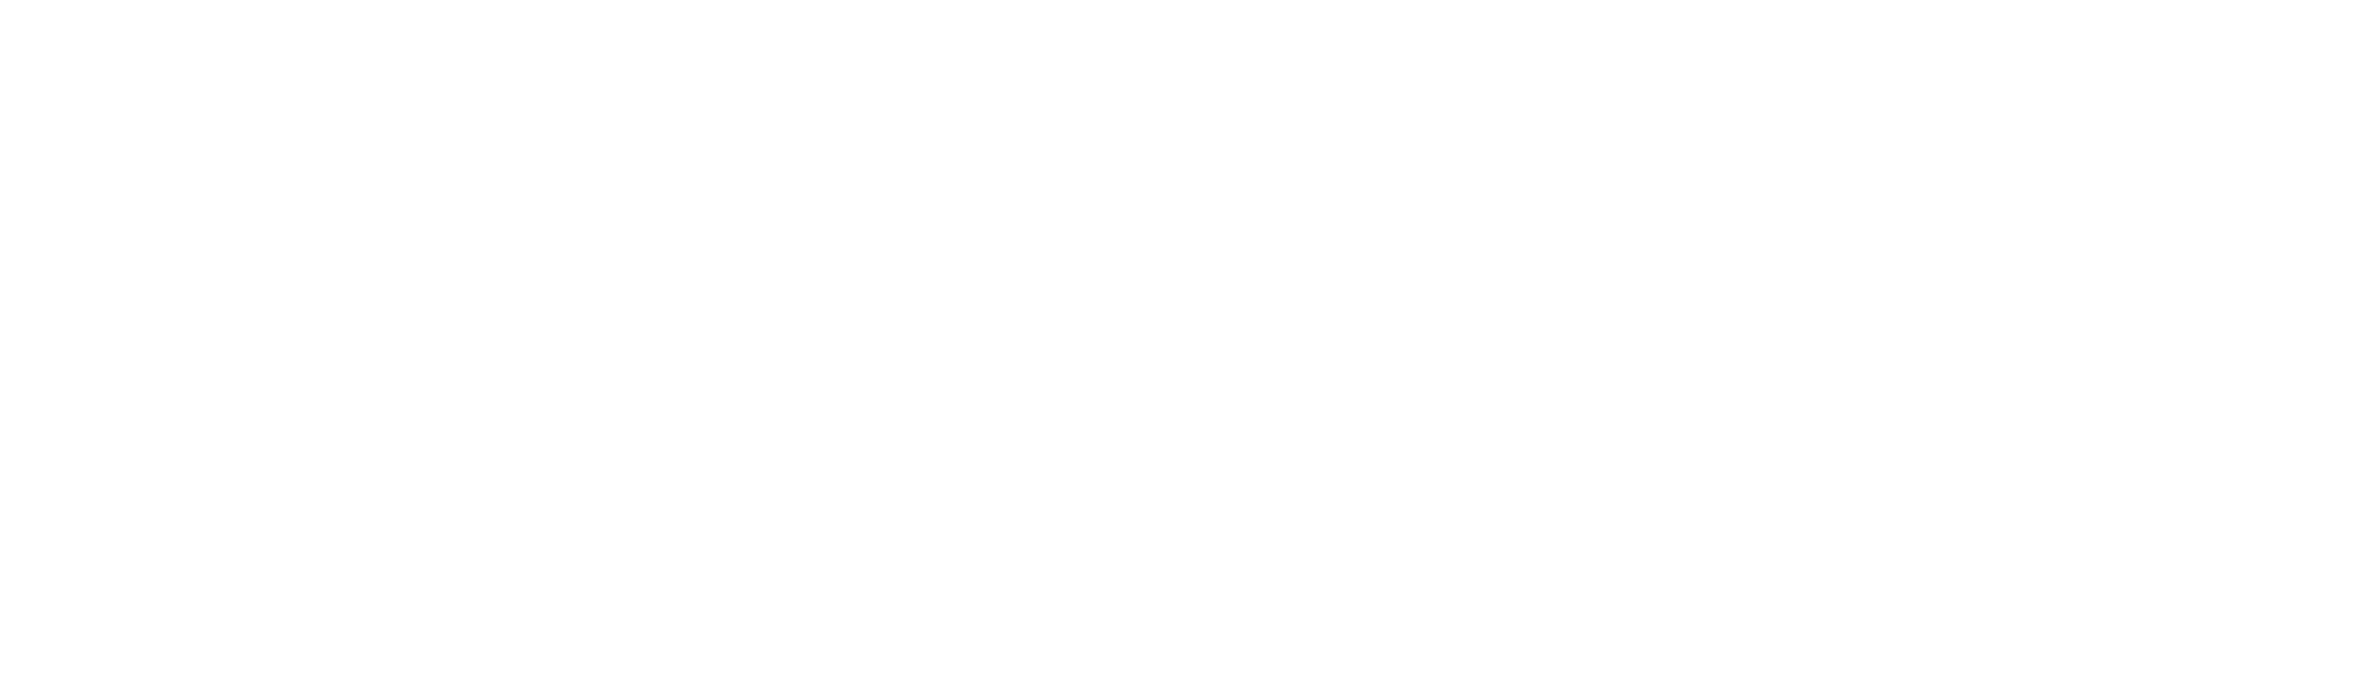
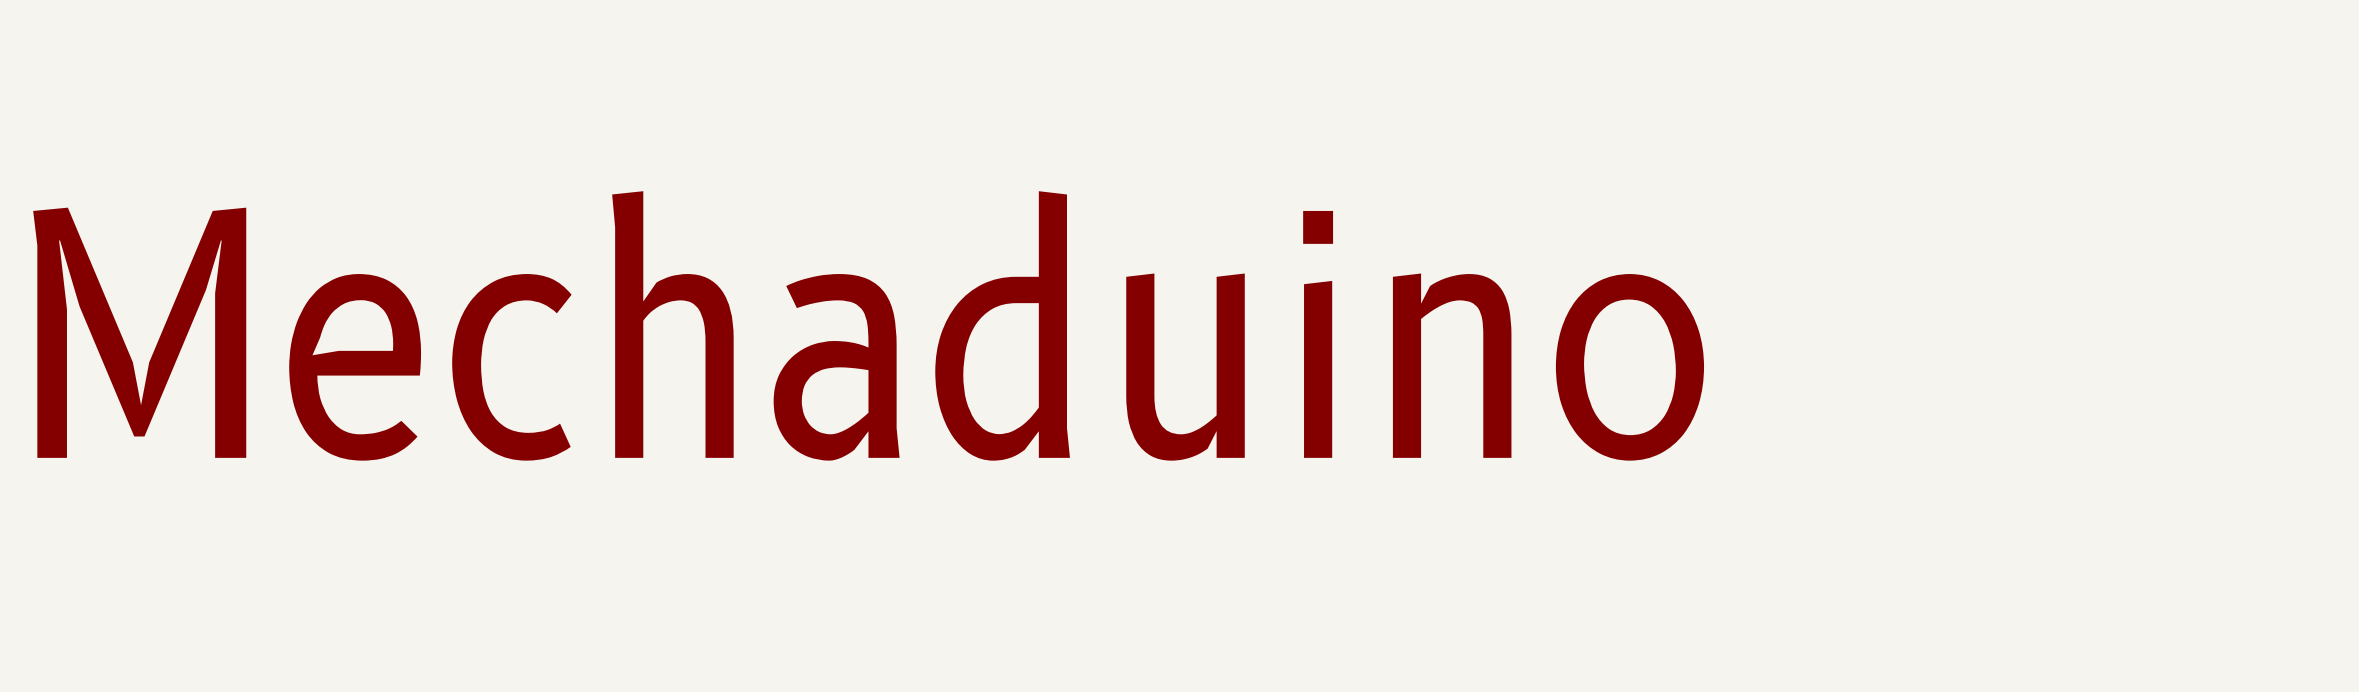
text: none -> Mechaduino (868, 325)

